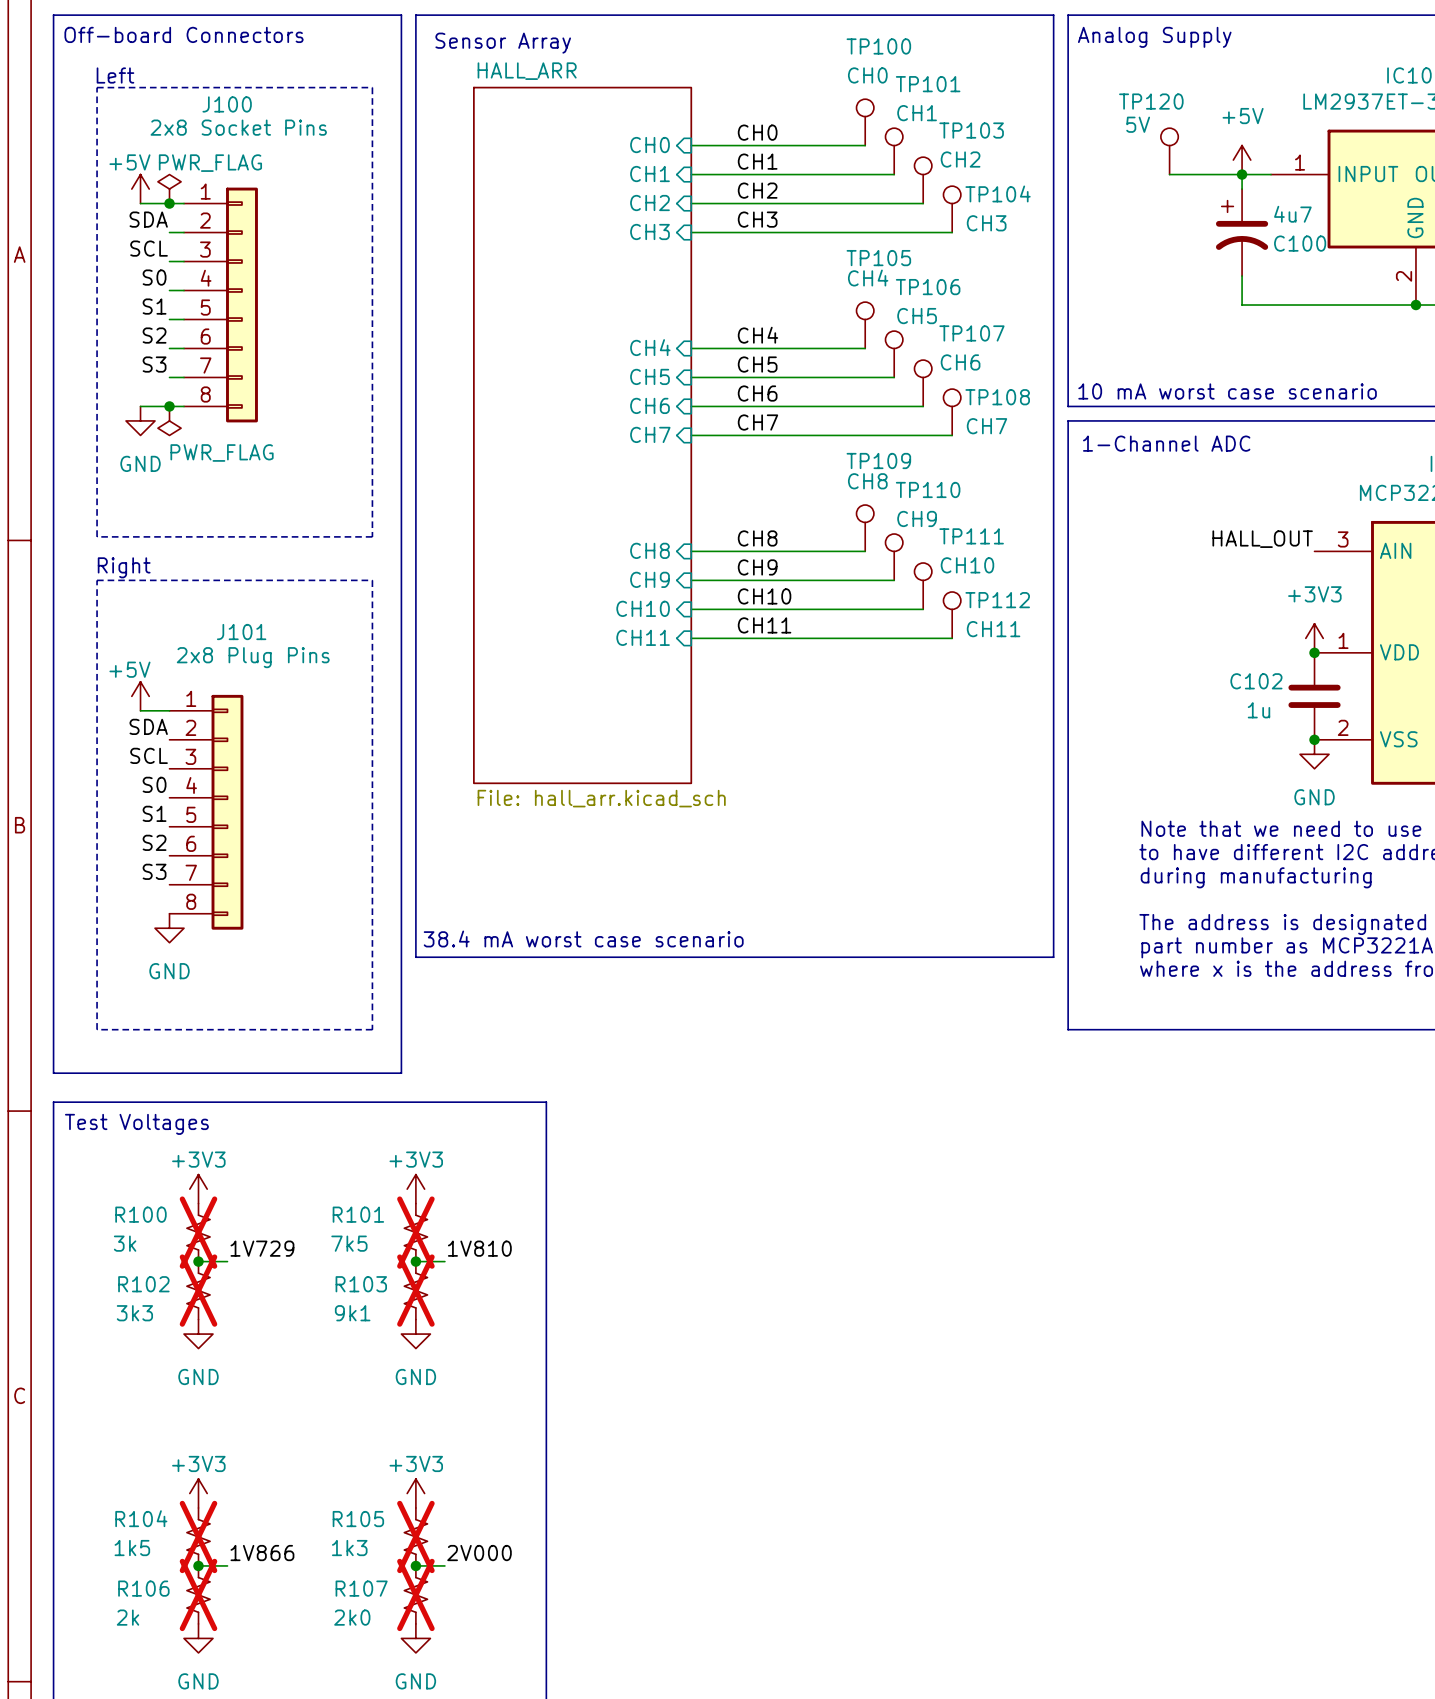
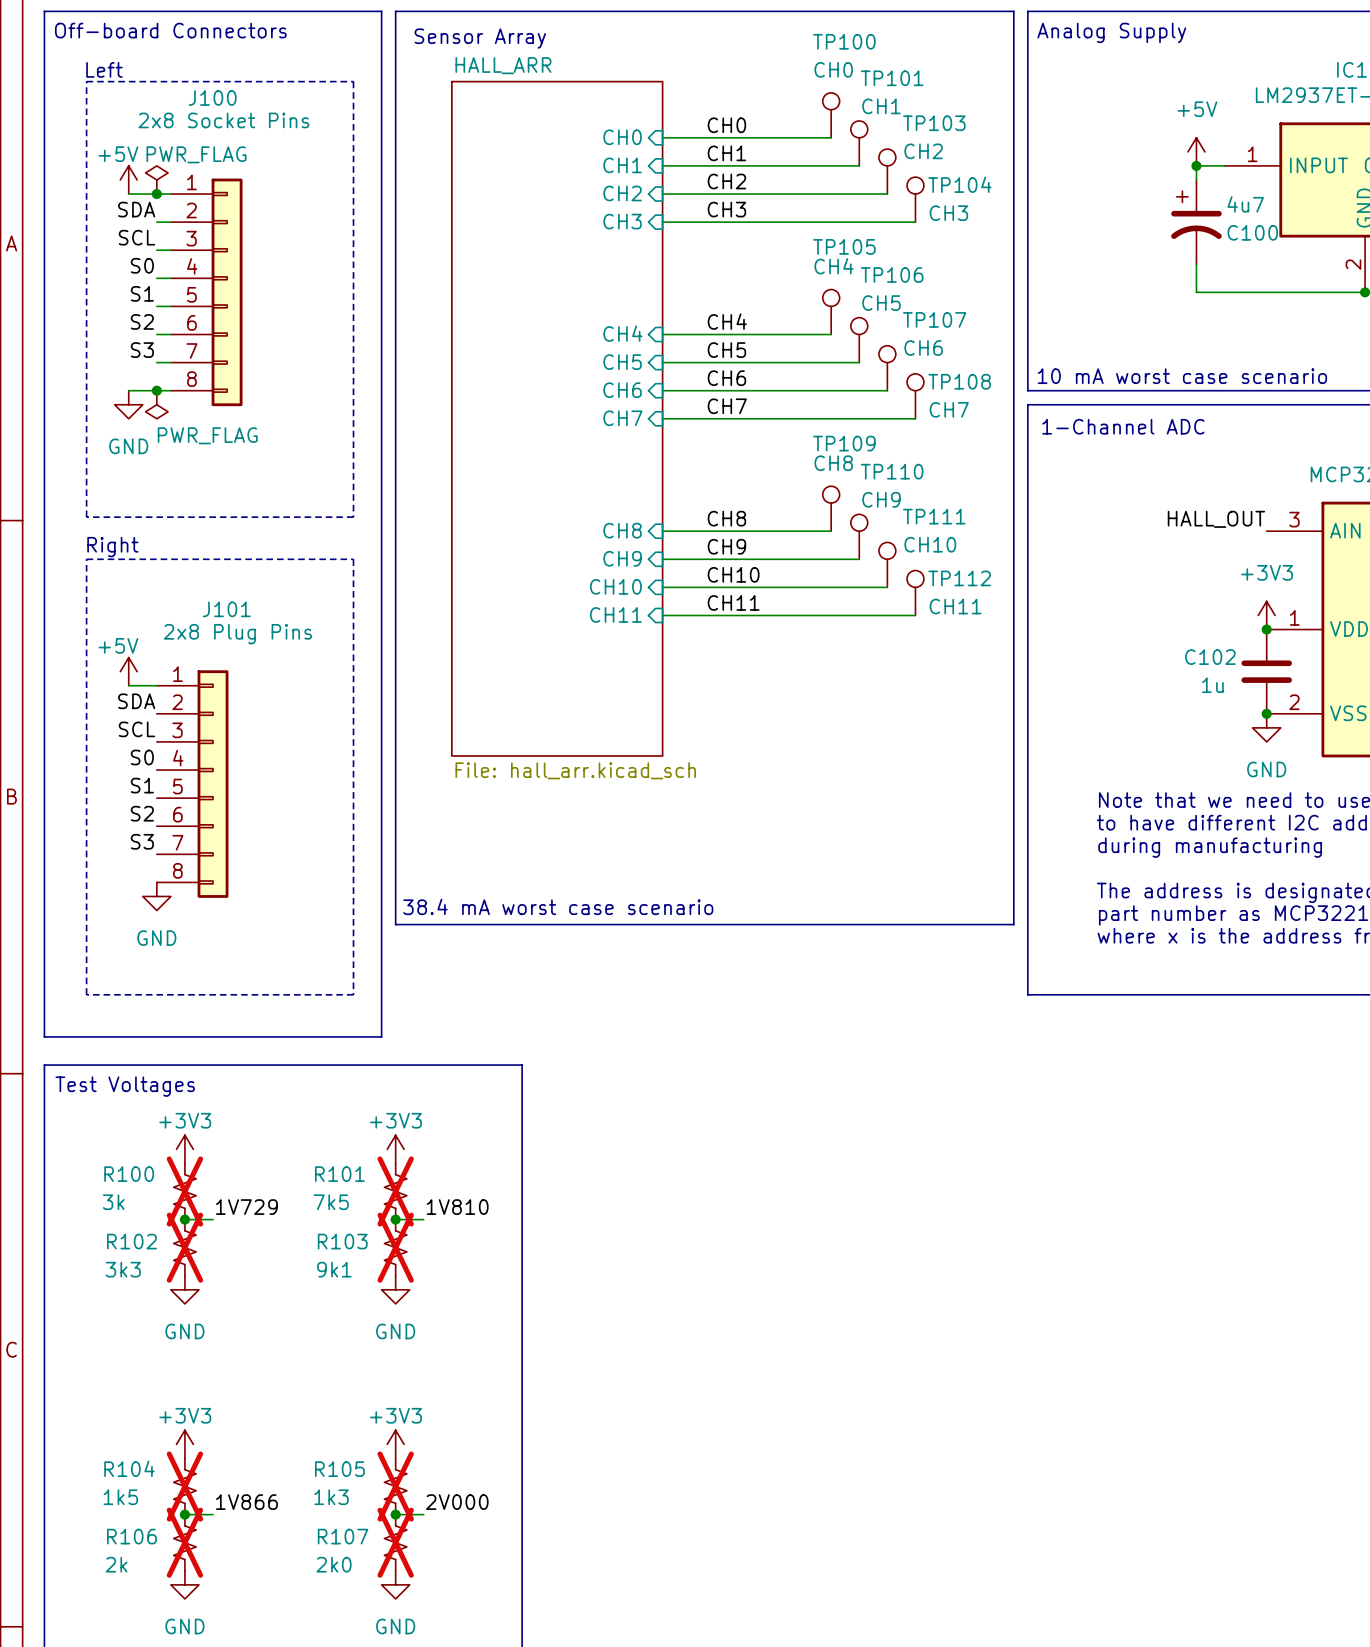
TP120: 5V (1169, 151) -> none
wire: (1169, 174) (1242, 174) -> none

